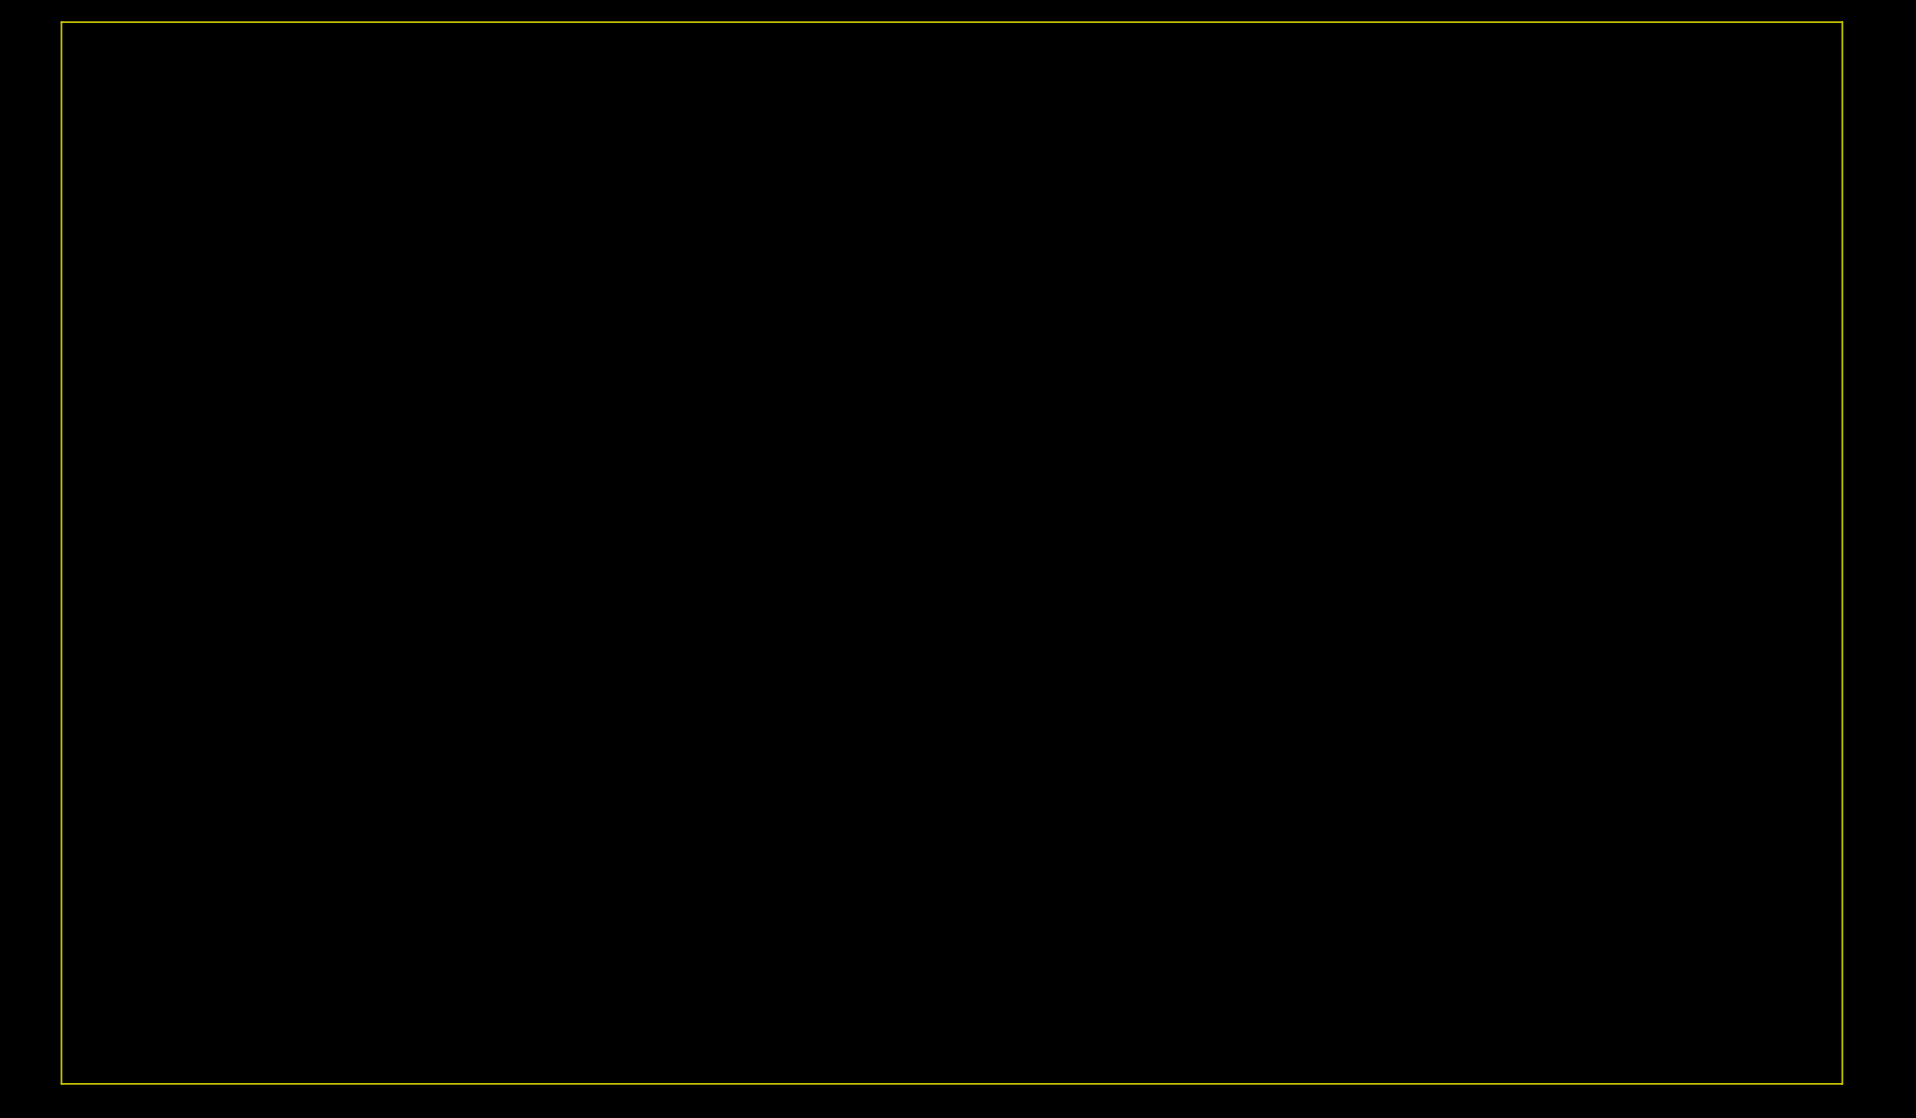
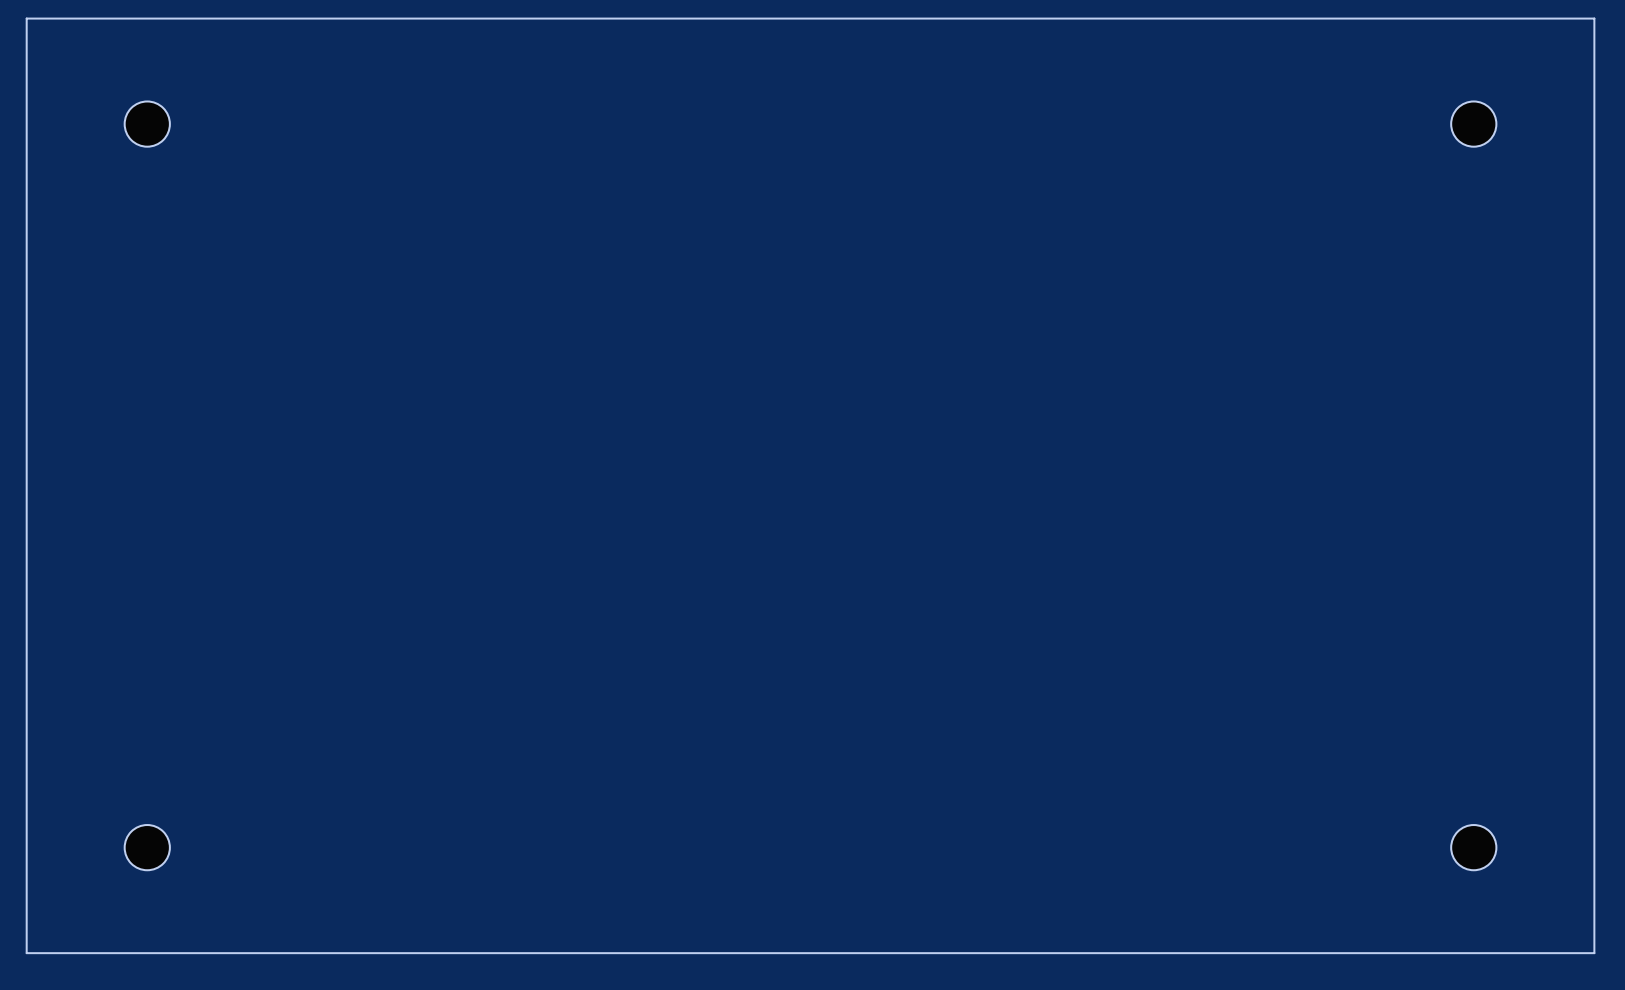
part: none -> (147, 124)
part: none -> (1473, 124)
part: none -> (147, 847)
part: none -> (1473, 847)

